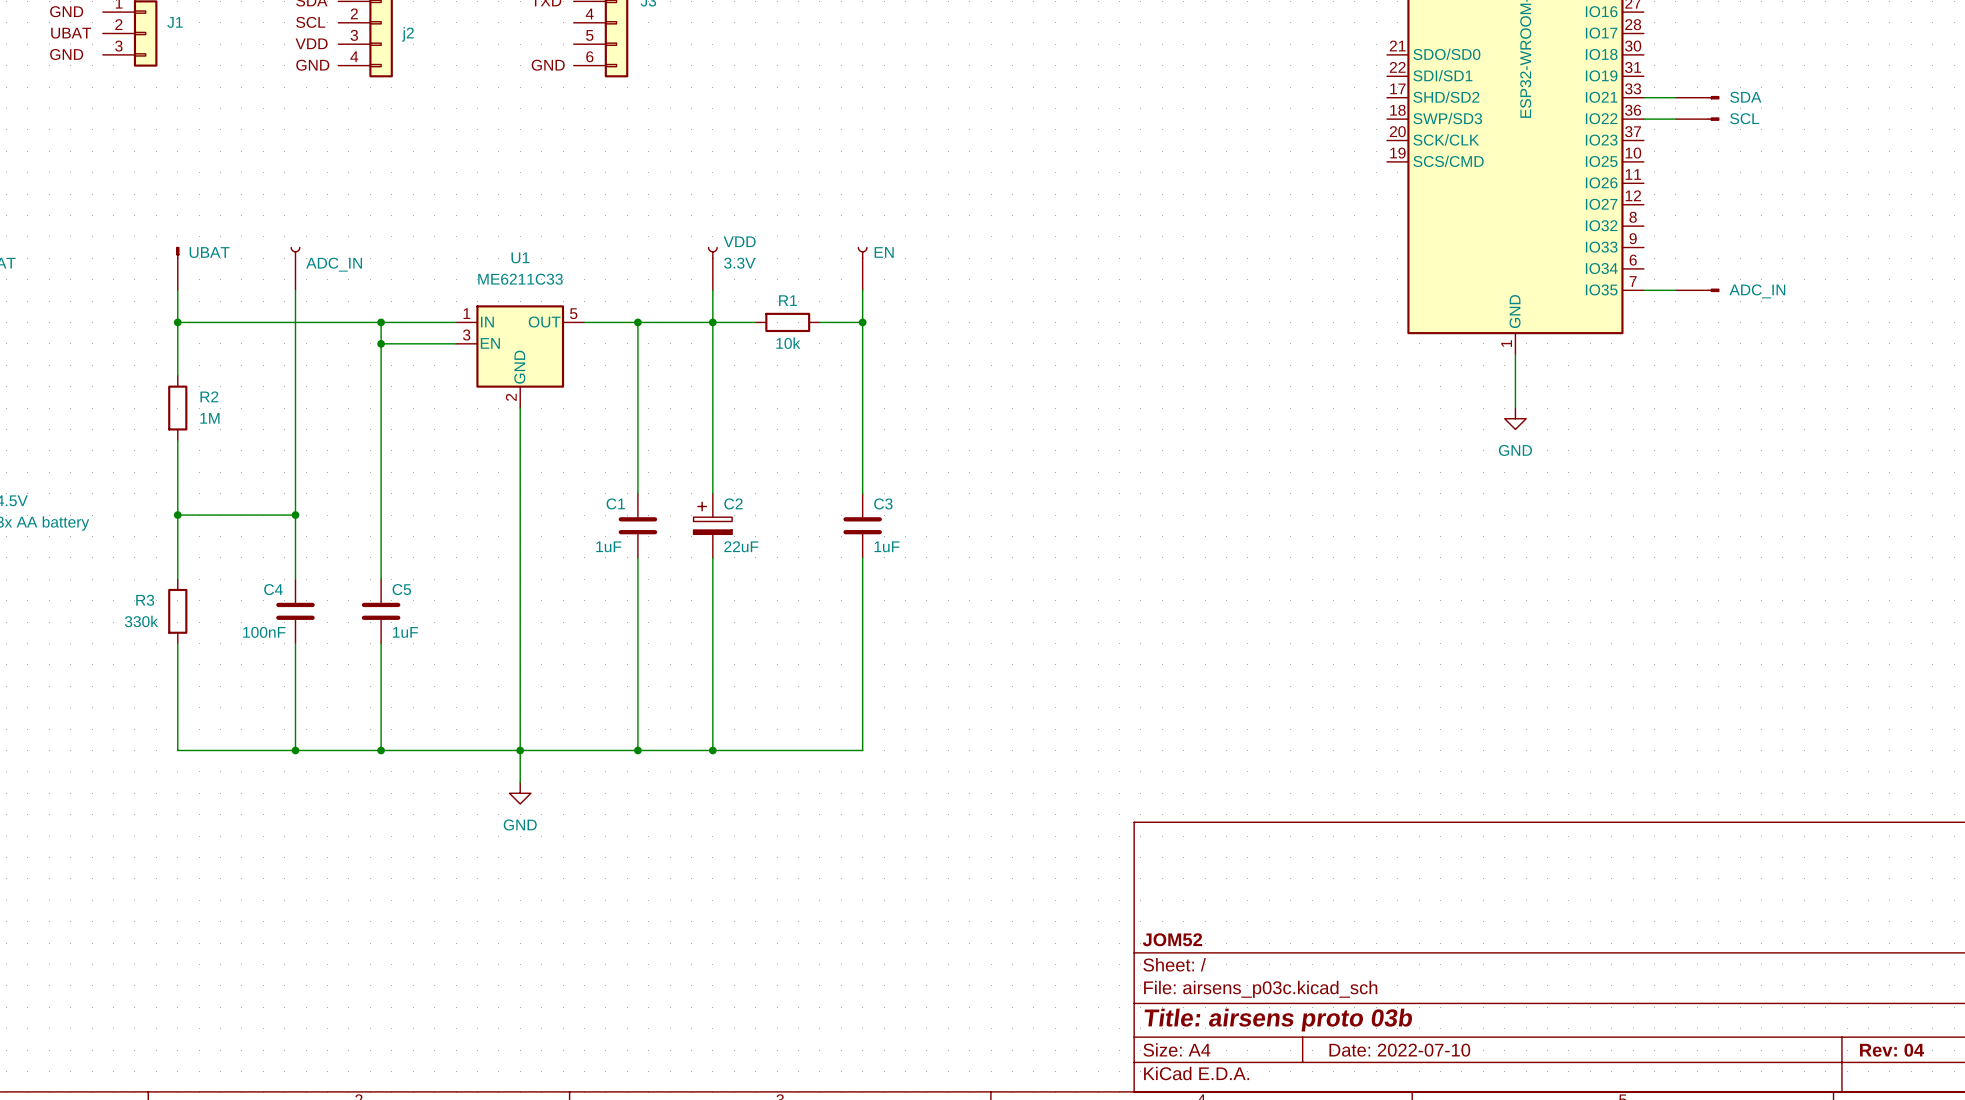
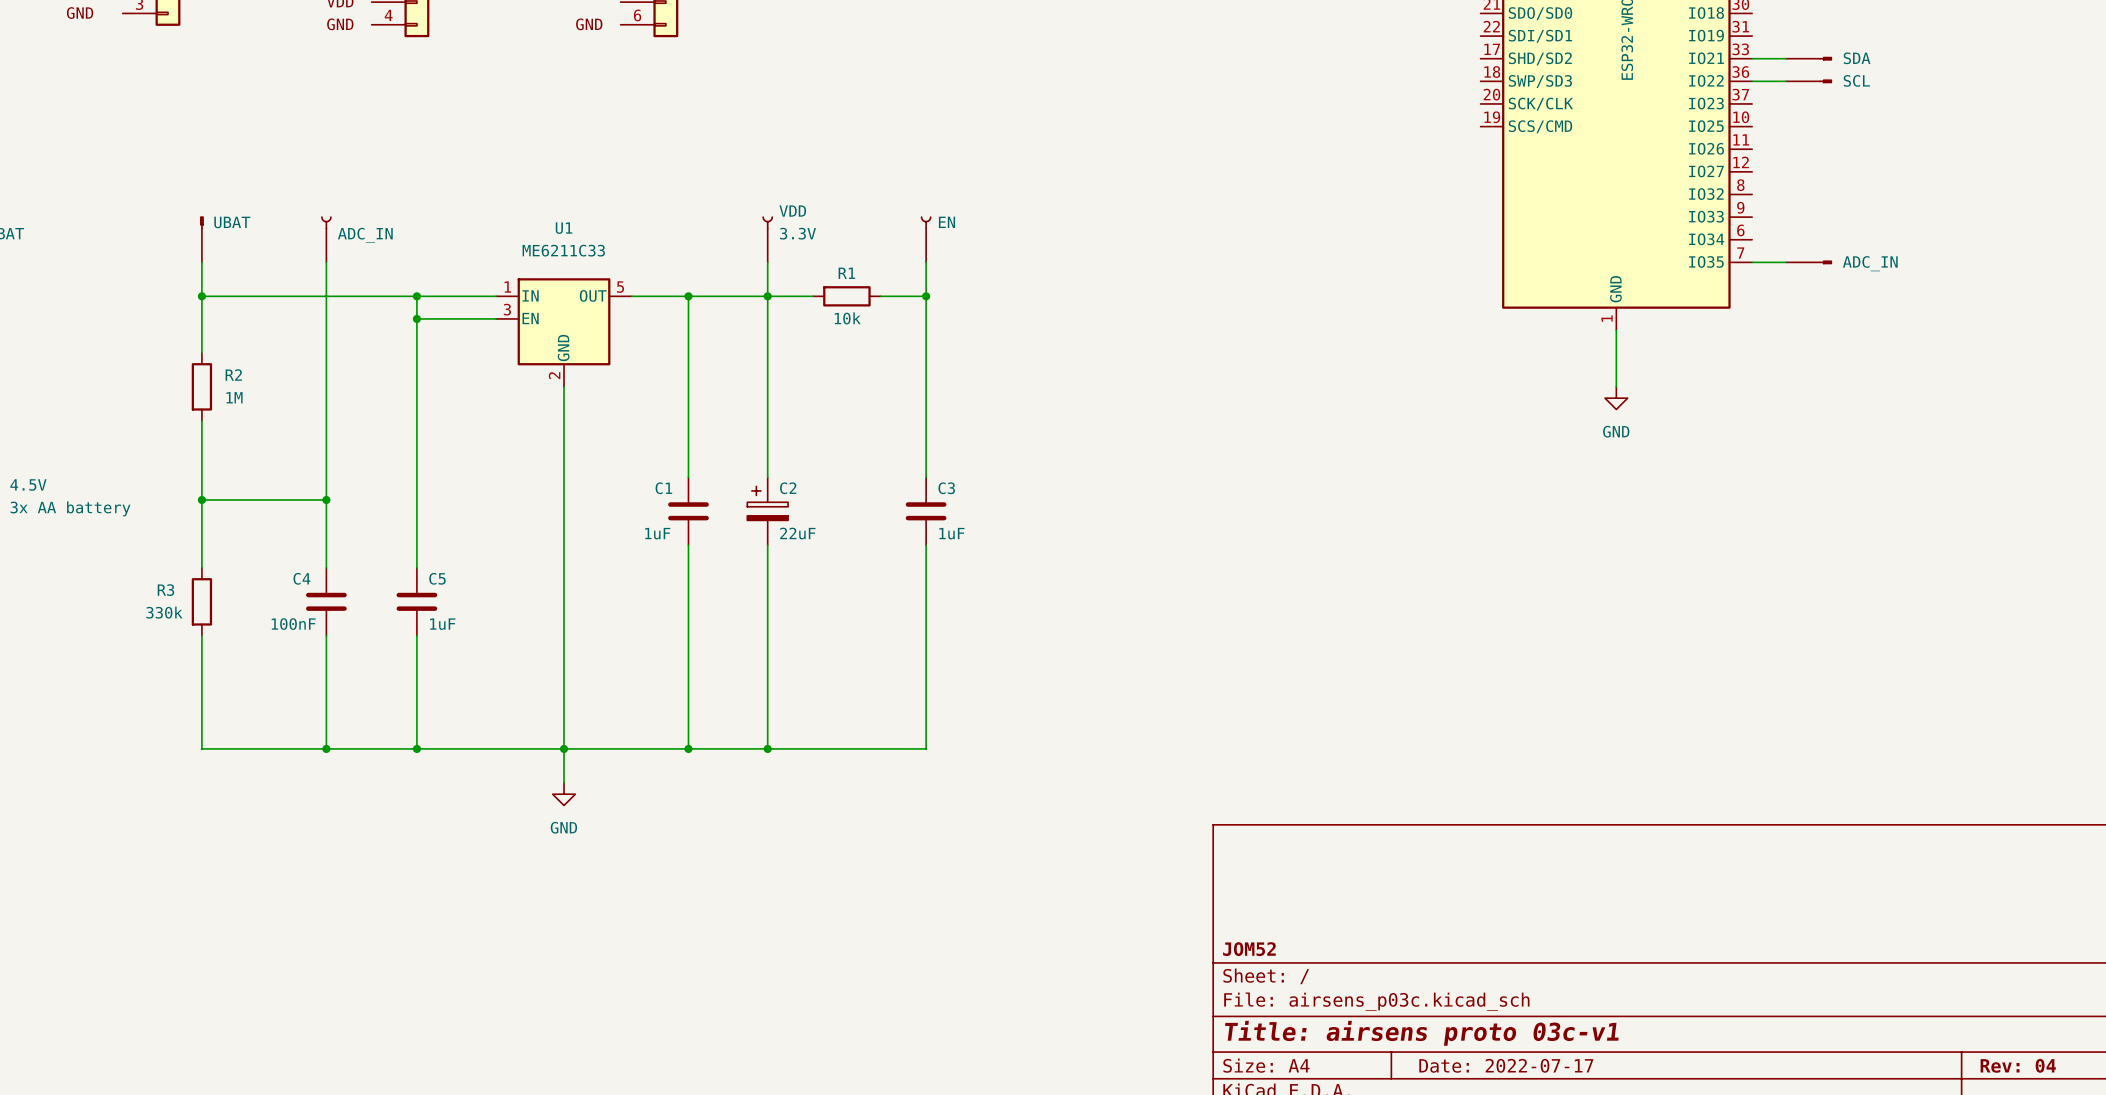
title block: Title: airsens proto 03b (1278, 1020) -> Title: airsens proto 03c-v1 (1421, 1033)
title block: Date: 2022-07-10 (1399, 1050) -> Date: 2022-07-17 (1506, 1065)

